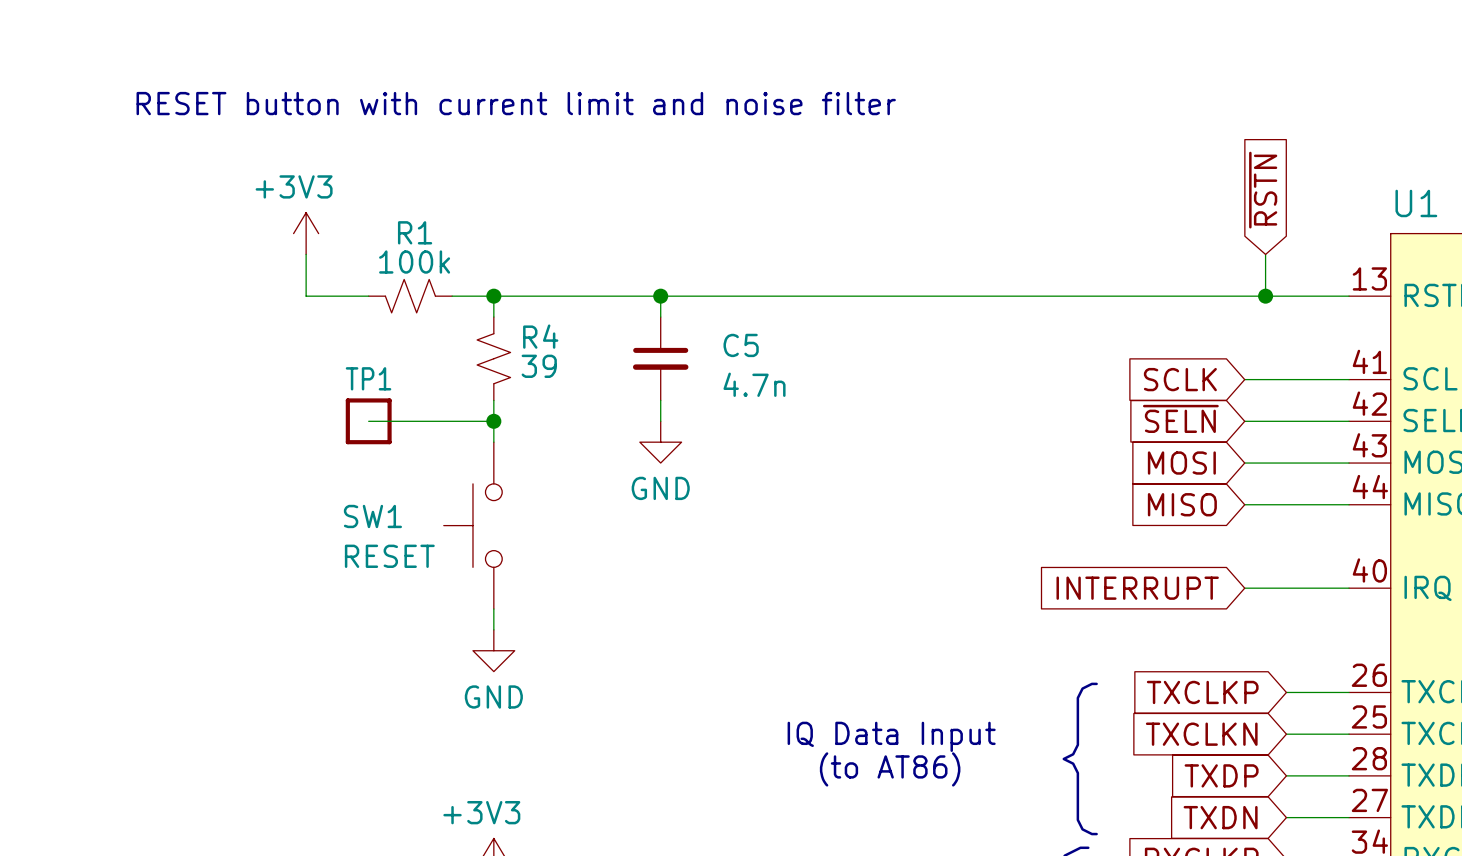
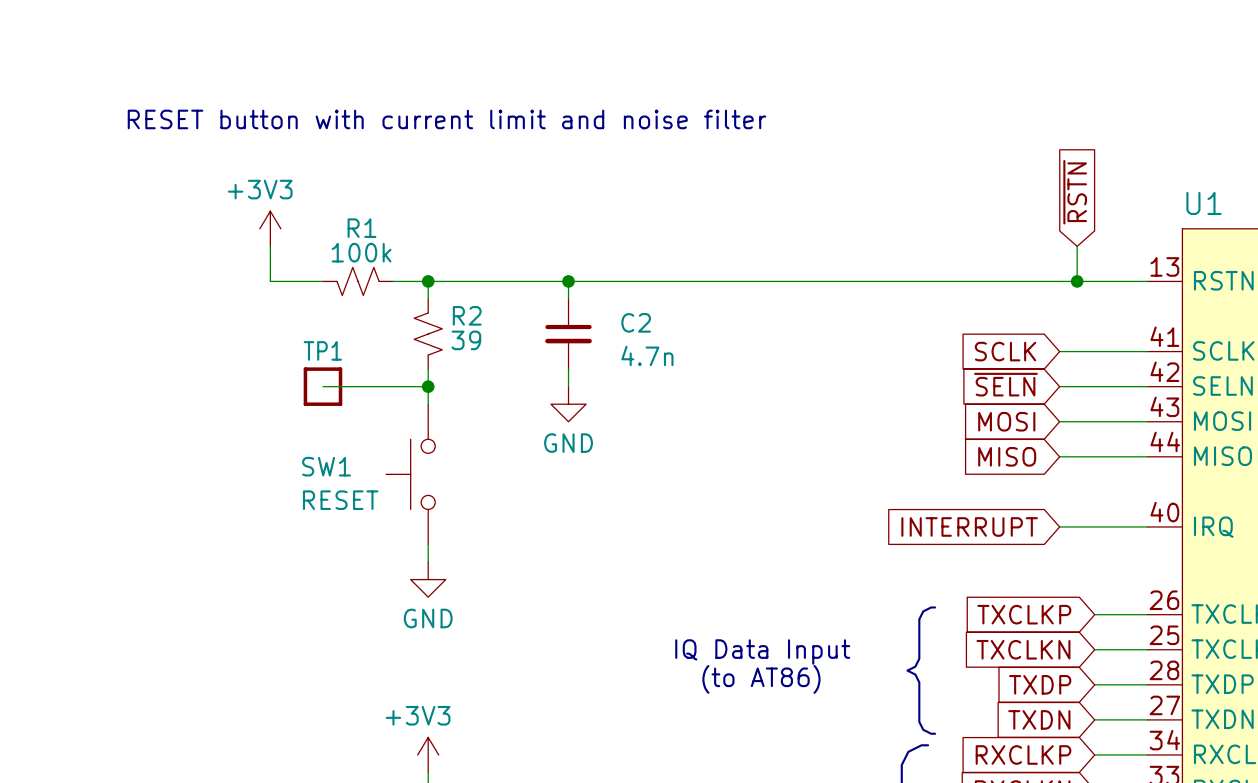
R4 name: R4 (540, 336) -> R2 (467, 315)
C5 name: C5 (741, 345) -> C2 (636, 322)

